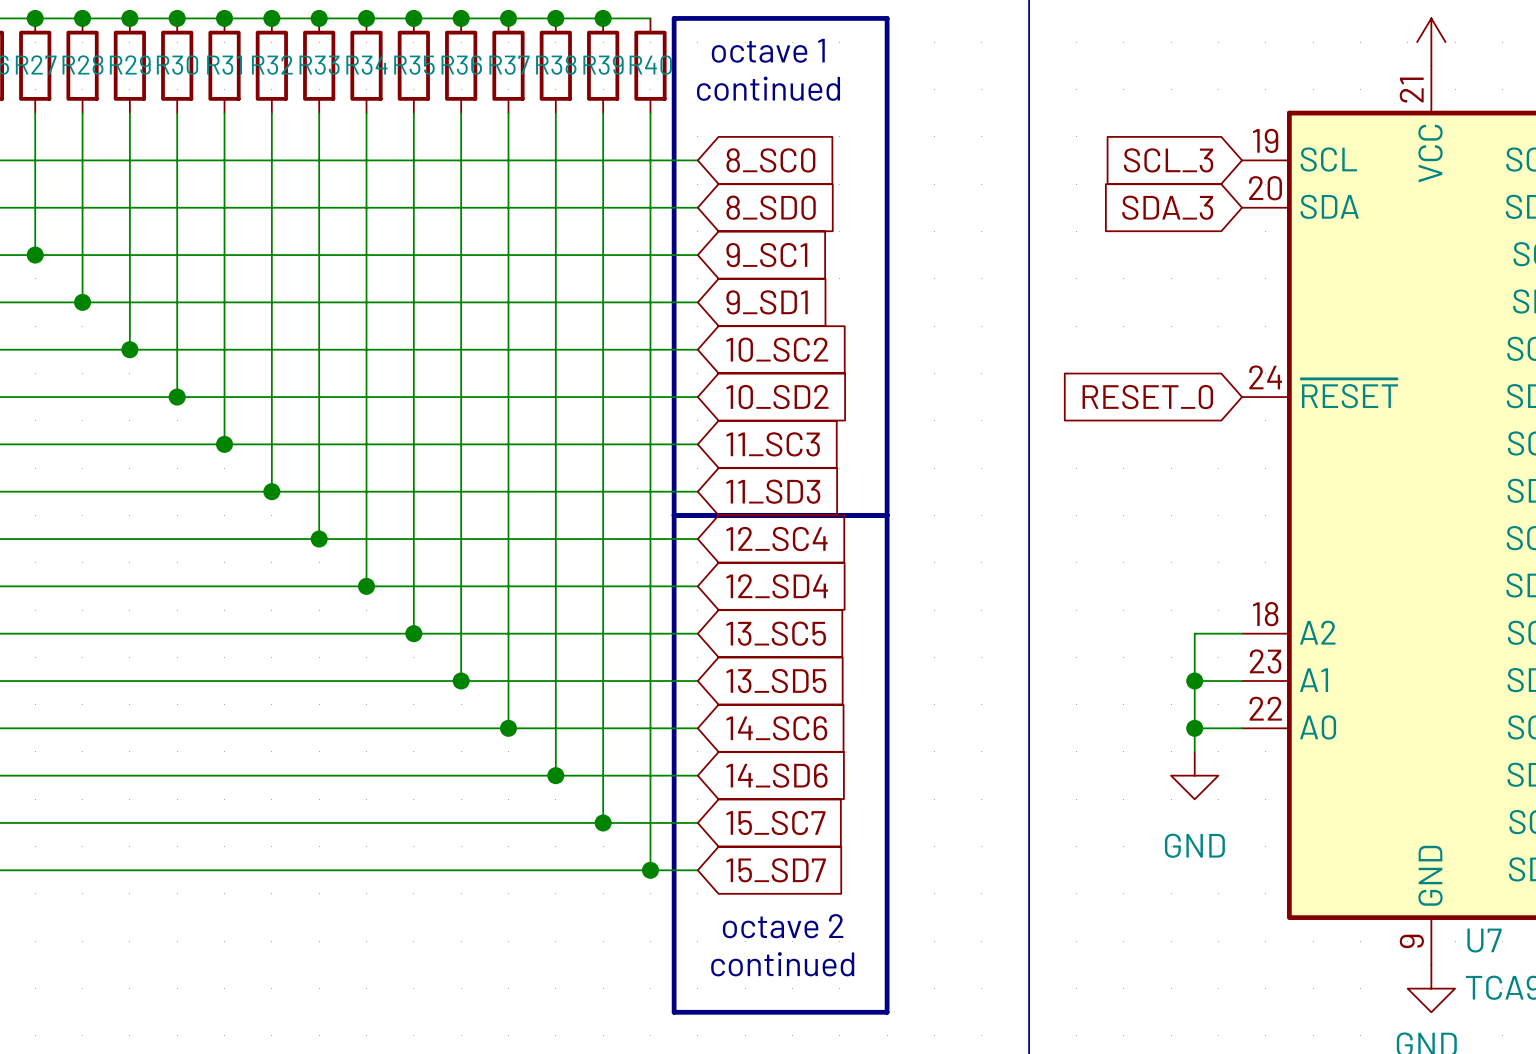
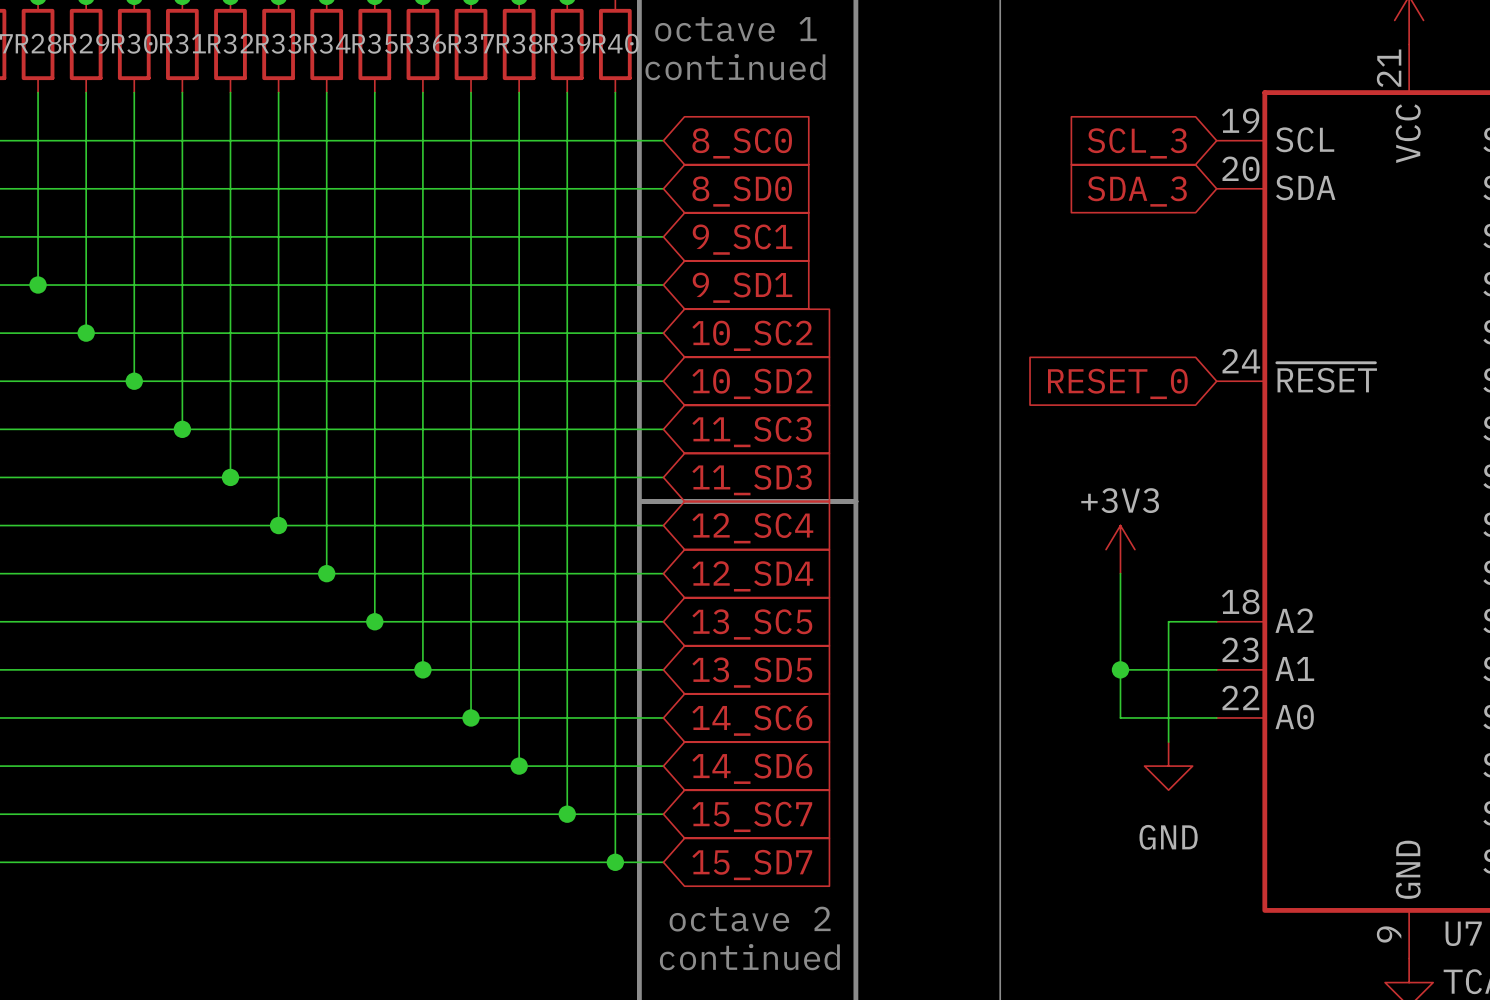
power symbol: none -> +3V3 (1120, 549)
wire: none -> (1120, 573) (1120, 717) (1168, 717)
wire: none -> (1120, 669) (1168, 669)
junction: none -> (1120, 669)
junction: (1194, 681) -> none
junction: (1194, 728) -> none

